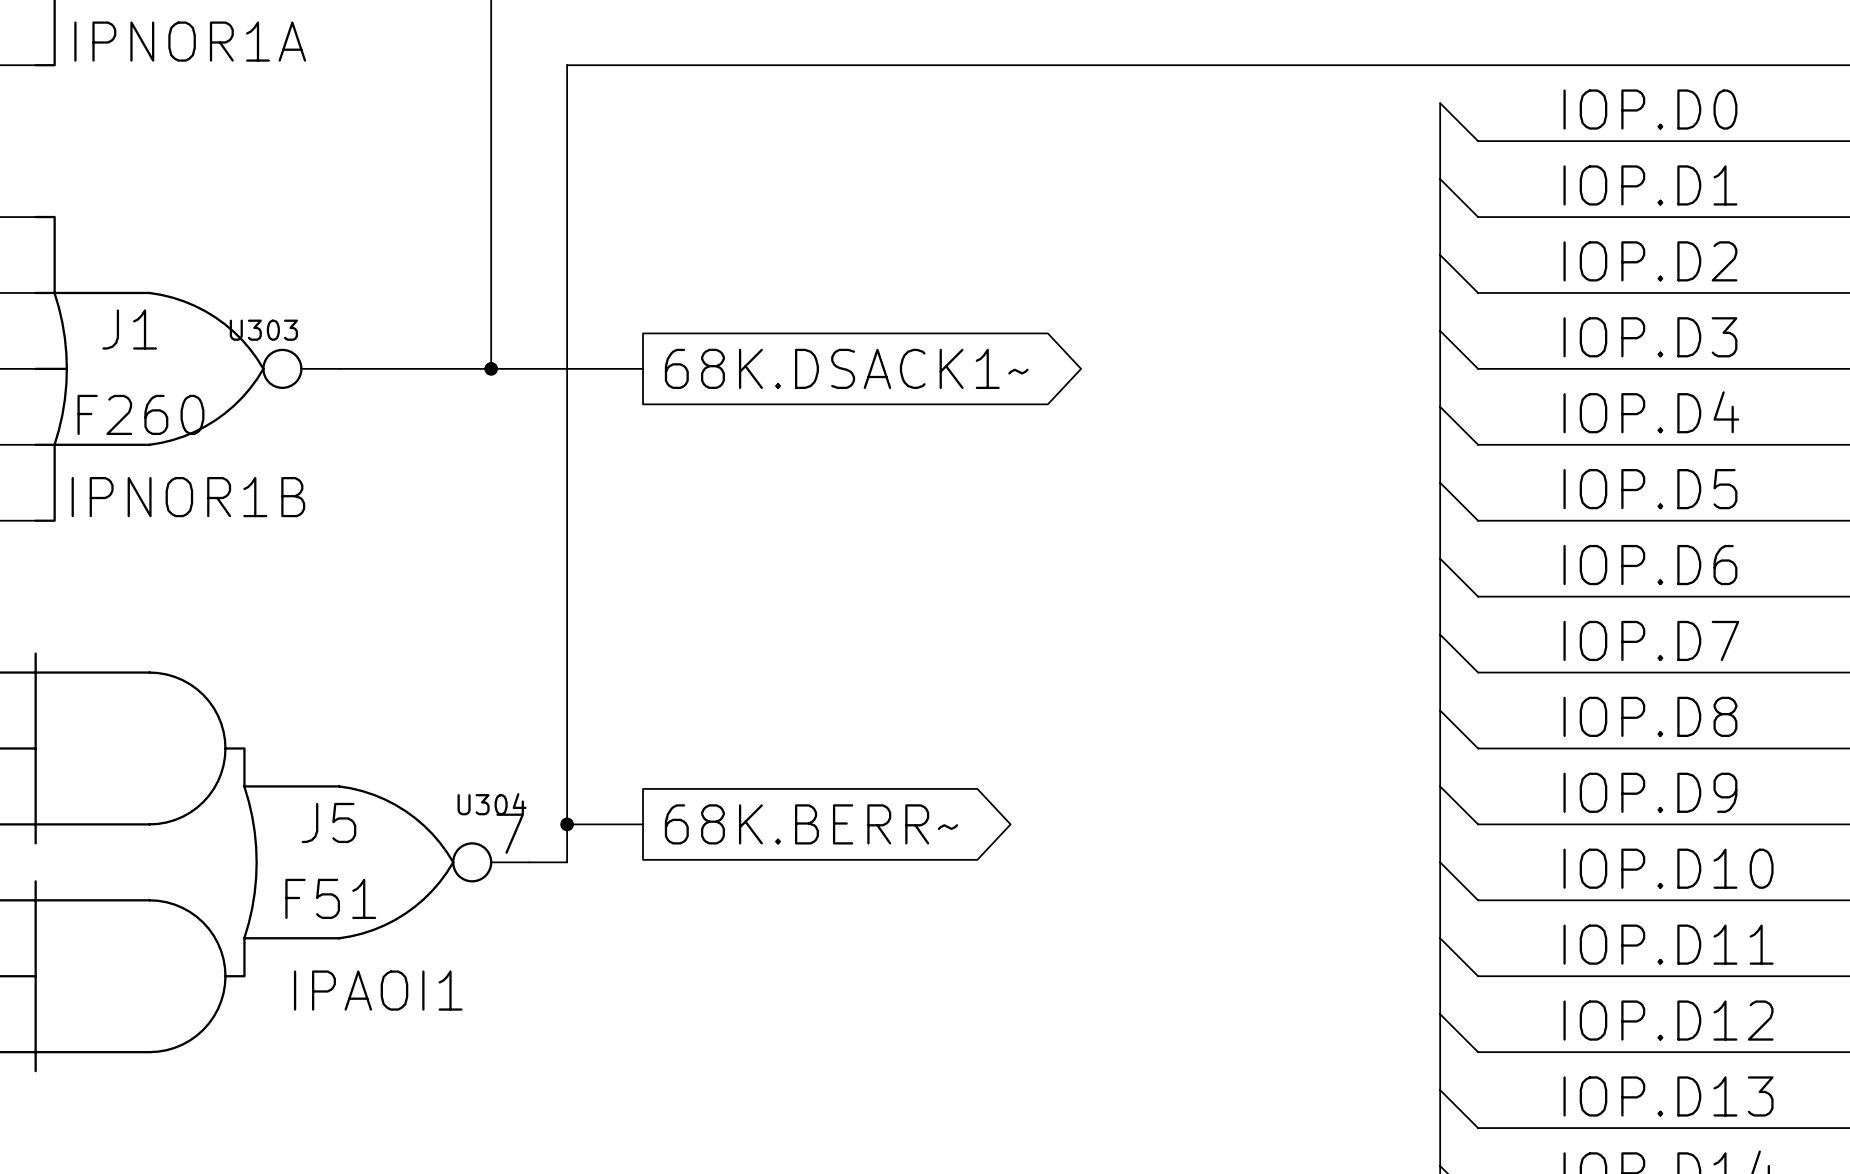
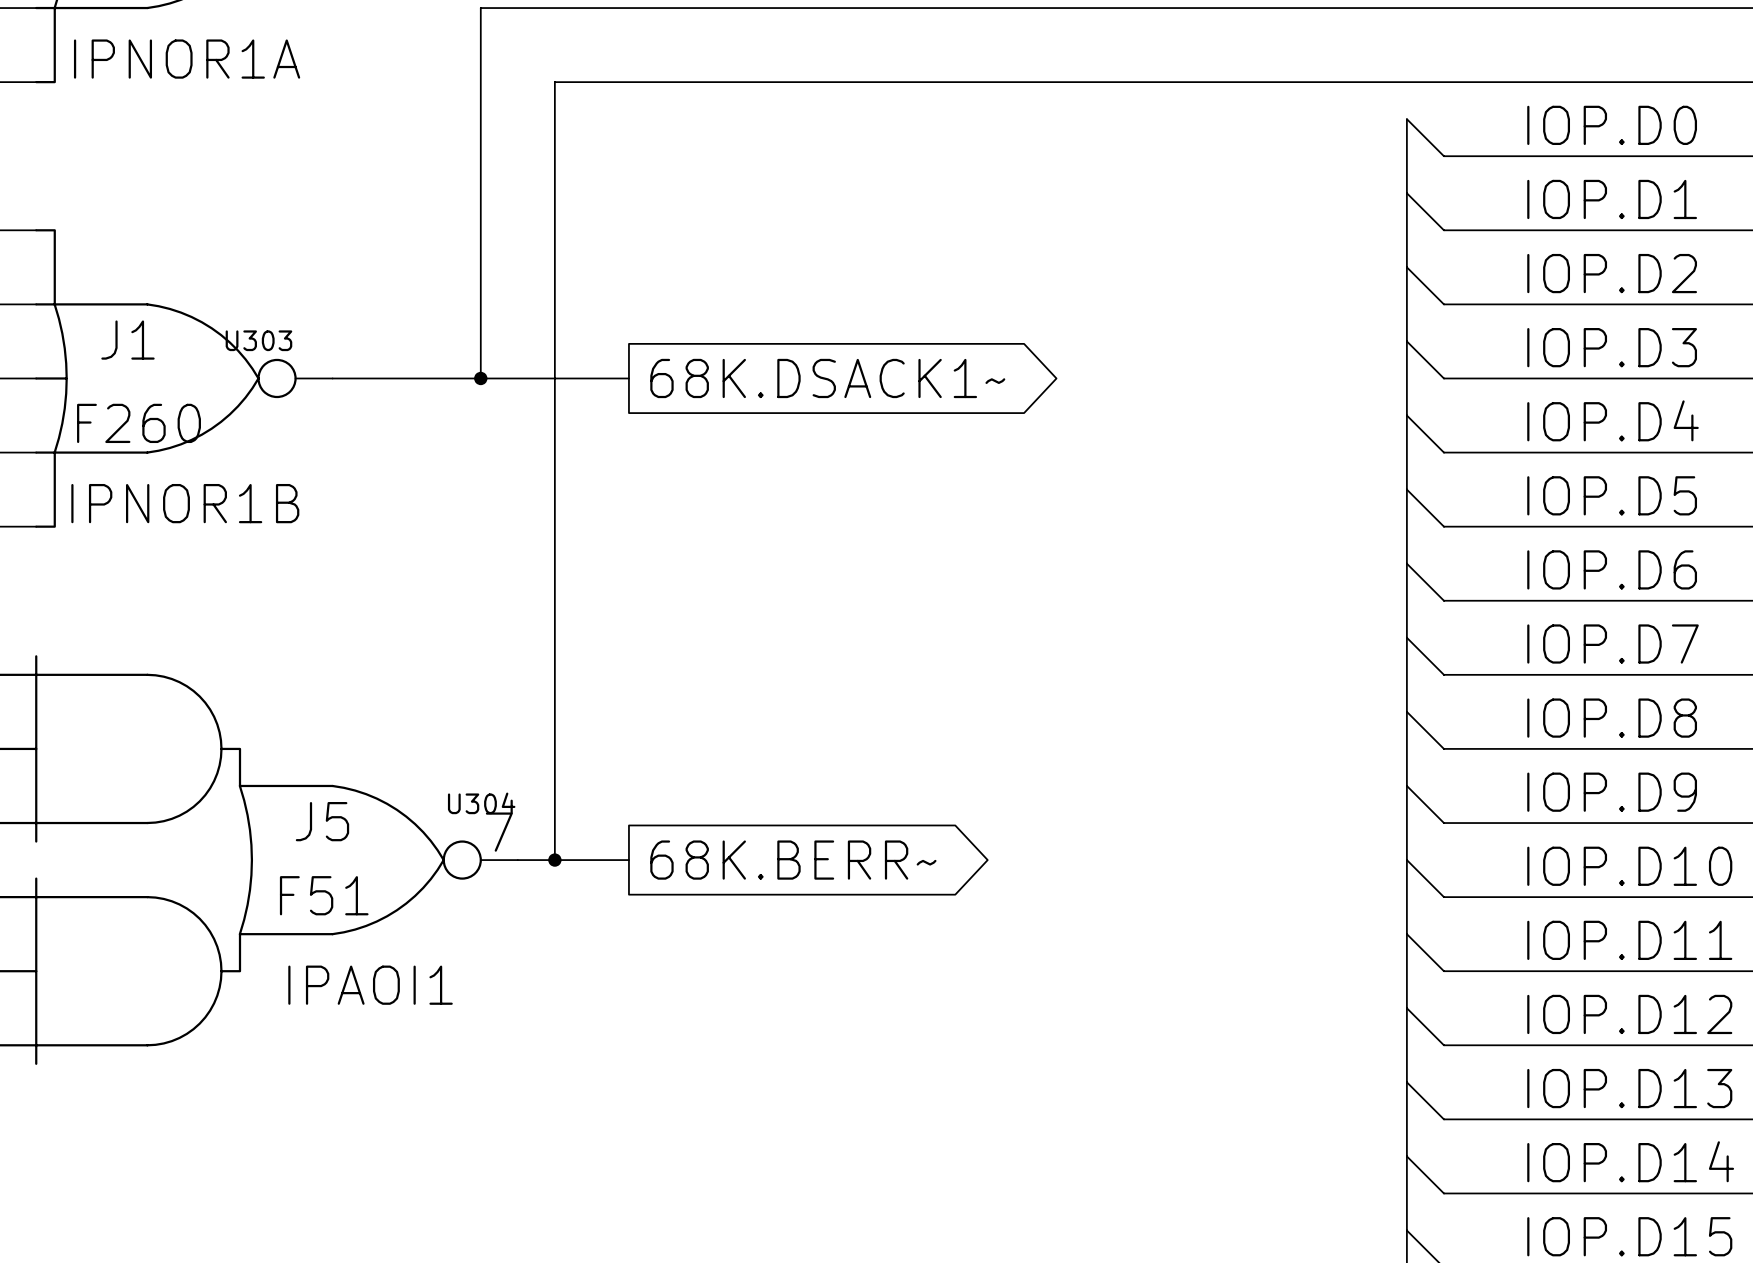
wire: (567, 824) (643, 824) -> (554, 860) (628, 860)
junction position: (567, 824) -> (554, 860)
global label position: 68K.BERR~ (811, 824) -> 68K.BERR~ (793, 860)

